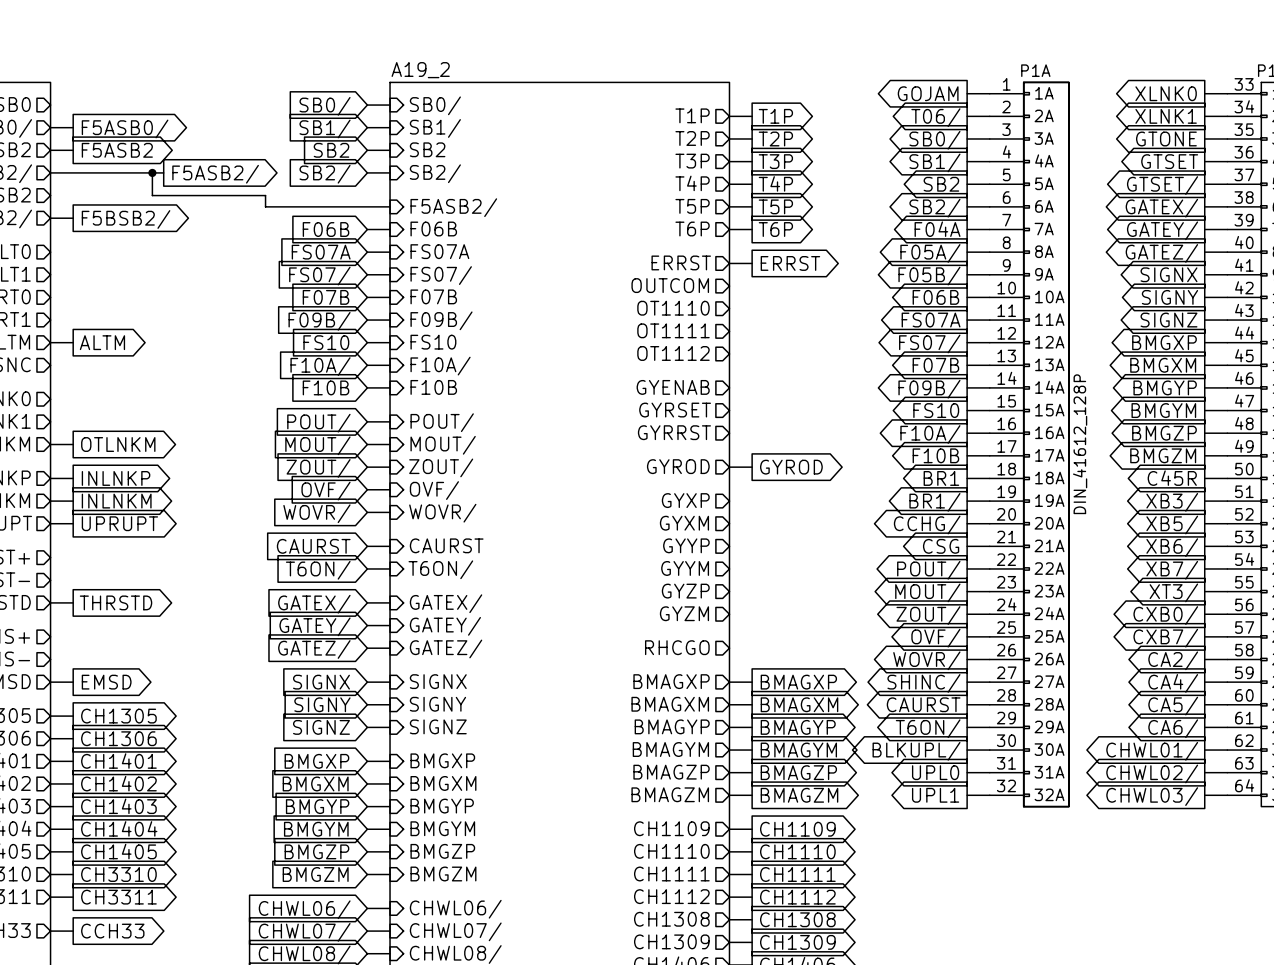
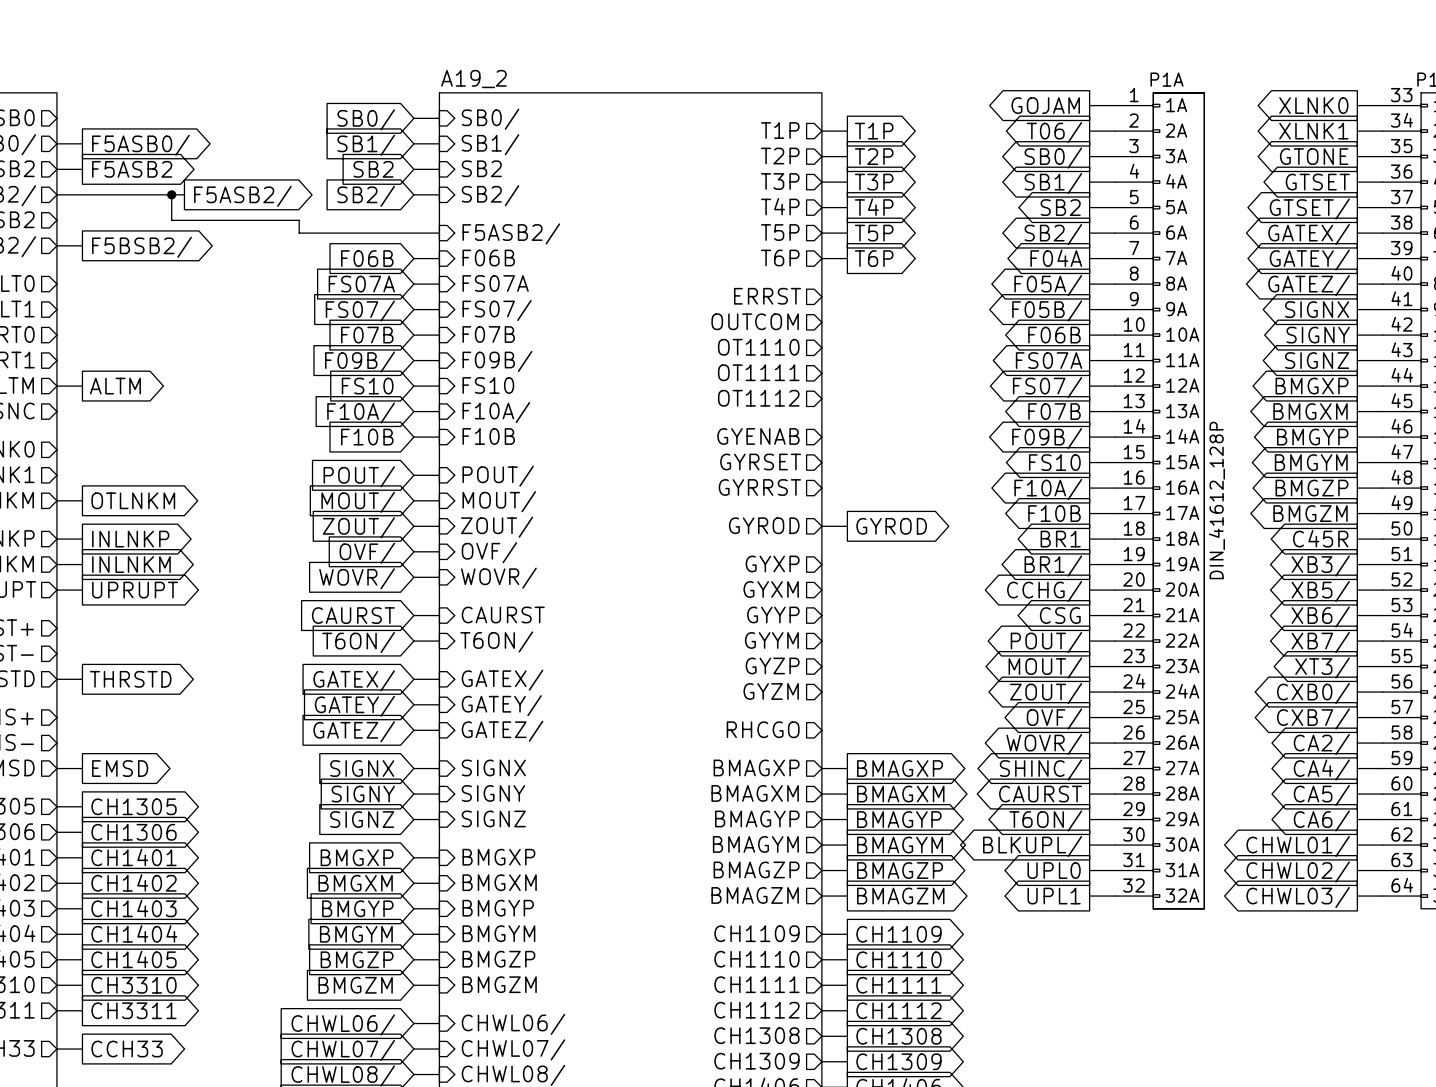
wire: (729, 263) (752, 263) -> none
global label: ERRST (790, 263) -> none

